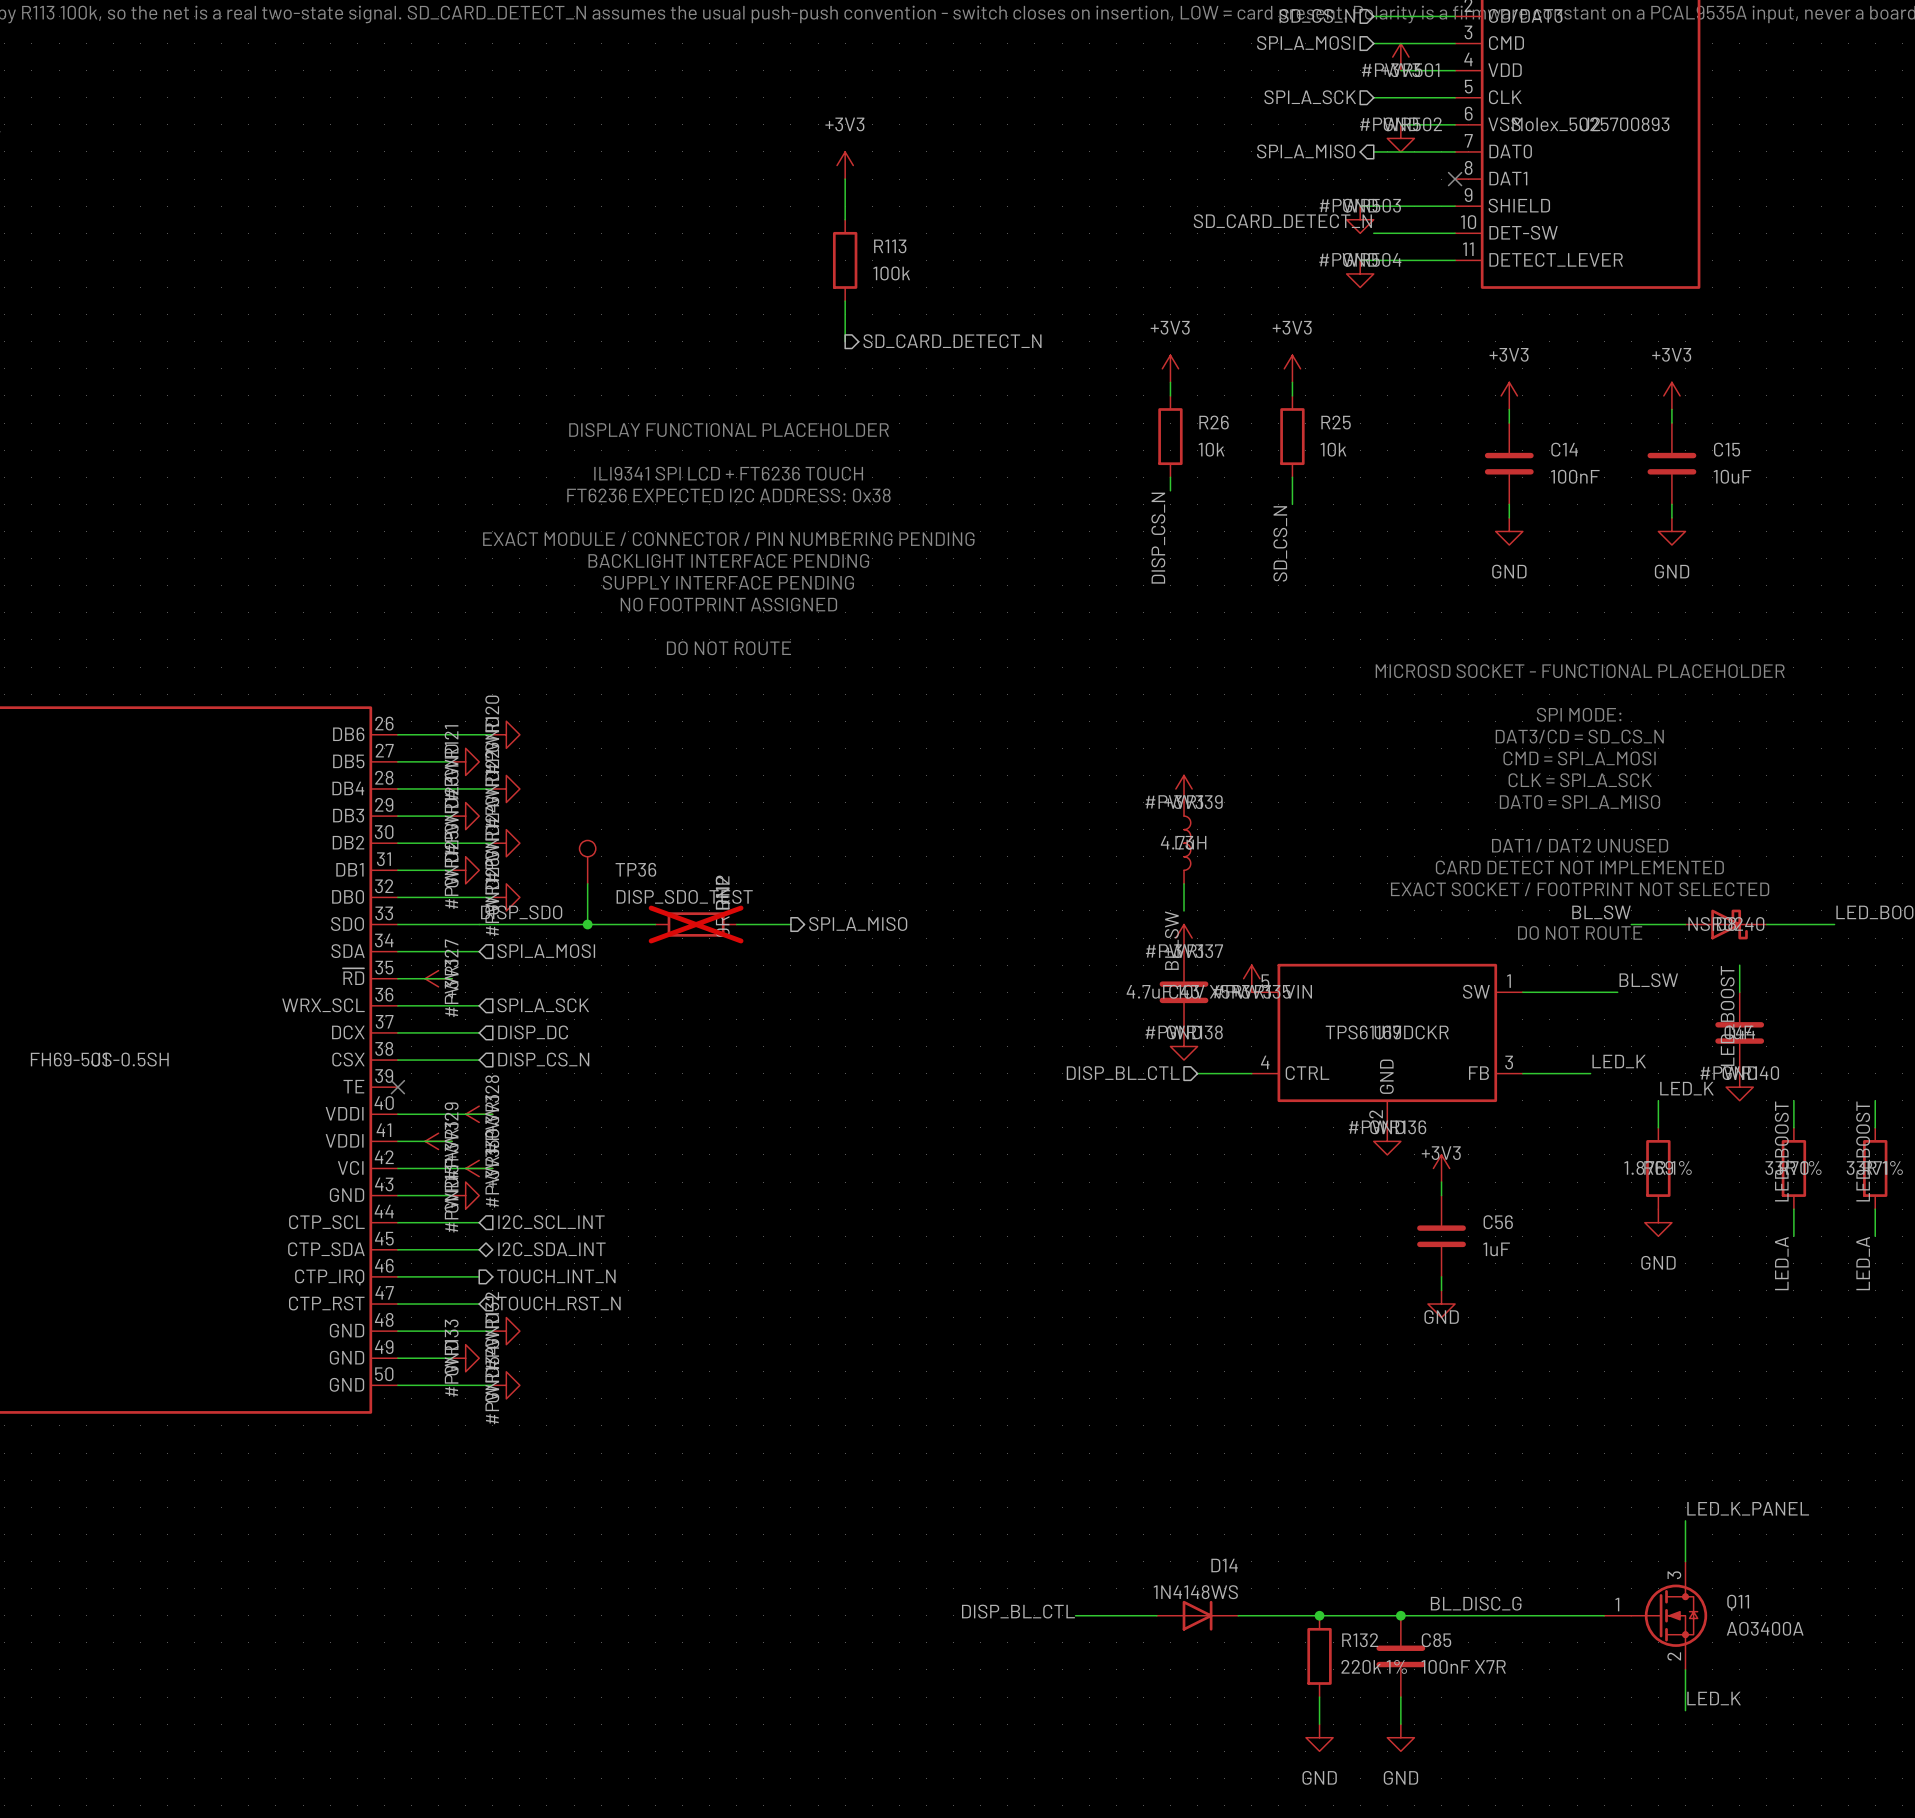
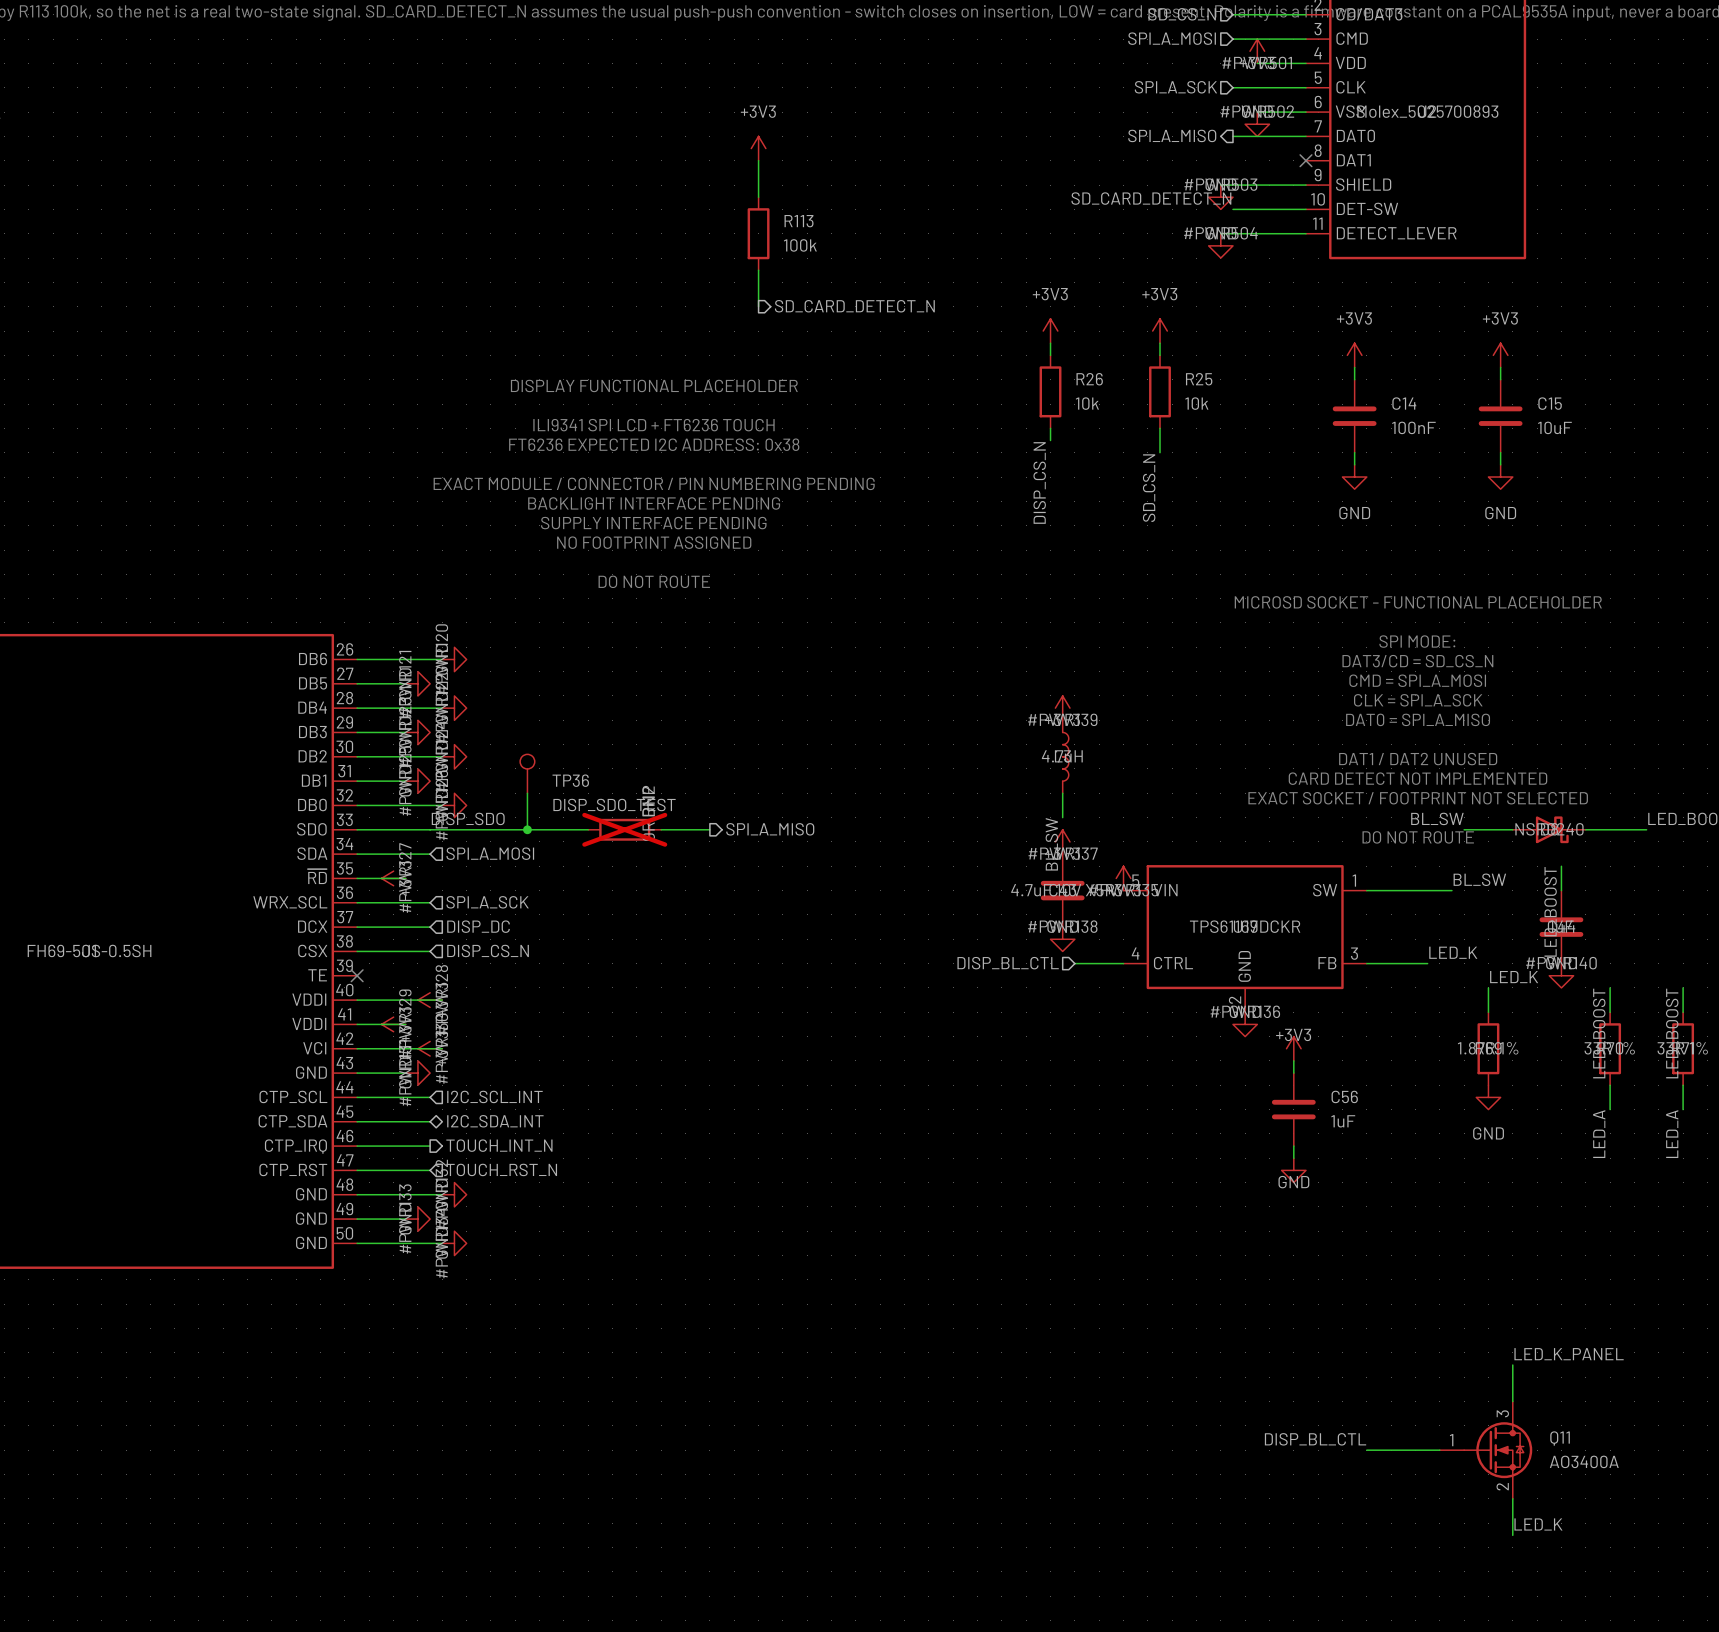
label: BL_DISC_G (1476, 1603) -> DISP_BL_CTL (1315, 1439)
label: DISP_BL_CTL (1018, 1611) -> none
wire: (1075, 1615) (1156, 1615) -> none
D14: 1N4148WS (1197, 1615) -> none
wire: (1238, 1615) (1522, 1615) -> none
junction: (1319, 1615) -> none
junction: (1400, 1615) -> none
R132: 220k 1% (1319, 1656) -> none
C85: 100nF X7R (1400, 1656) -> none
wire: (1319, 1697) (1319, 1724) -> none
wire: (1400, 1697) (1400, 1724) -> none
power symbol: GND (1319, 1737) -> none
power symbol: GND (1400, 1737) -> none

